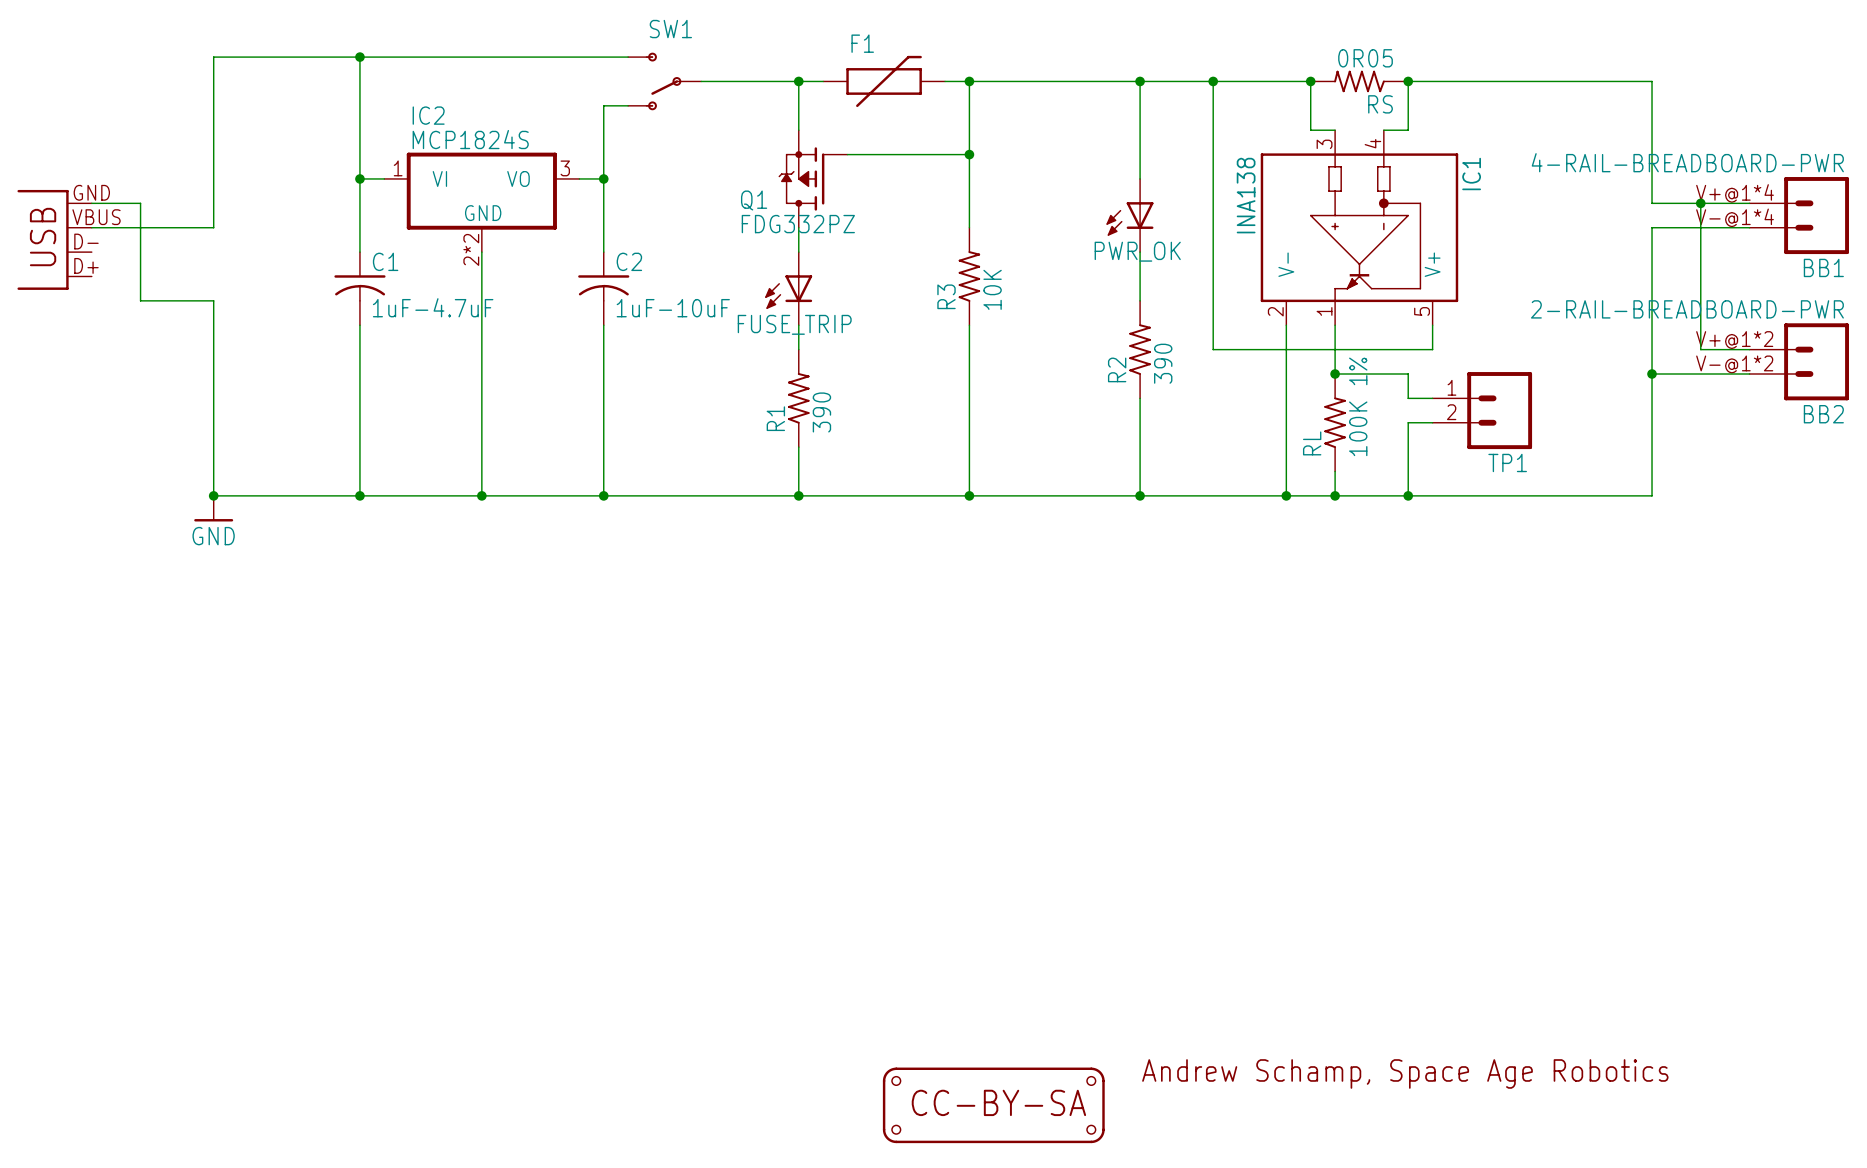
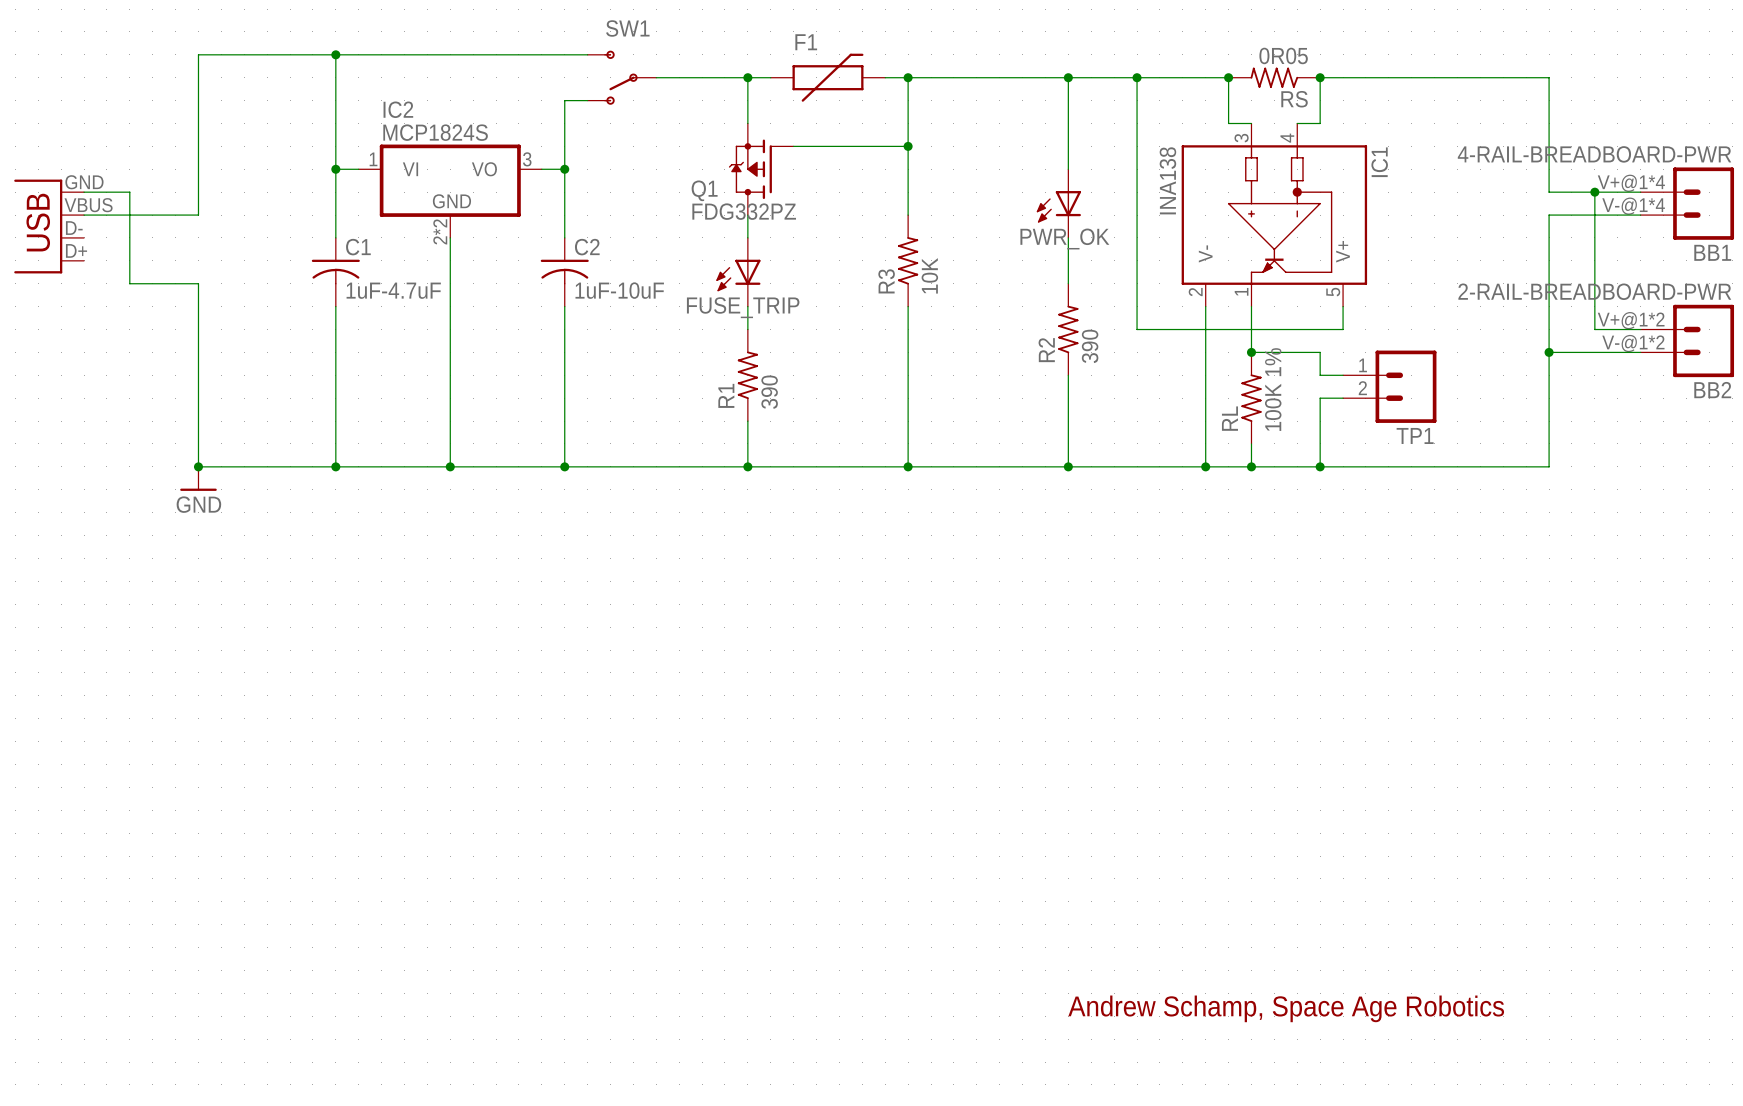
part: (993, 1105) -> none

